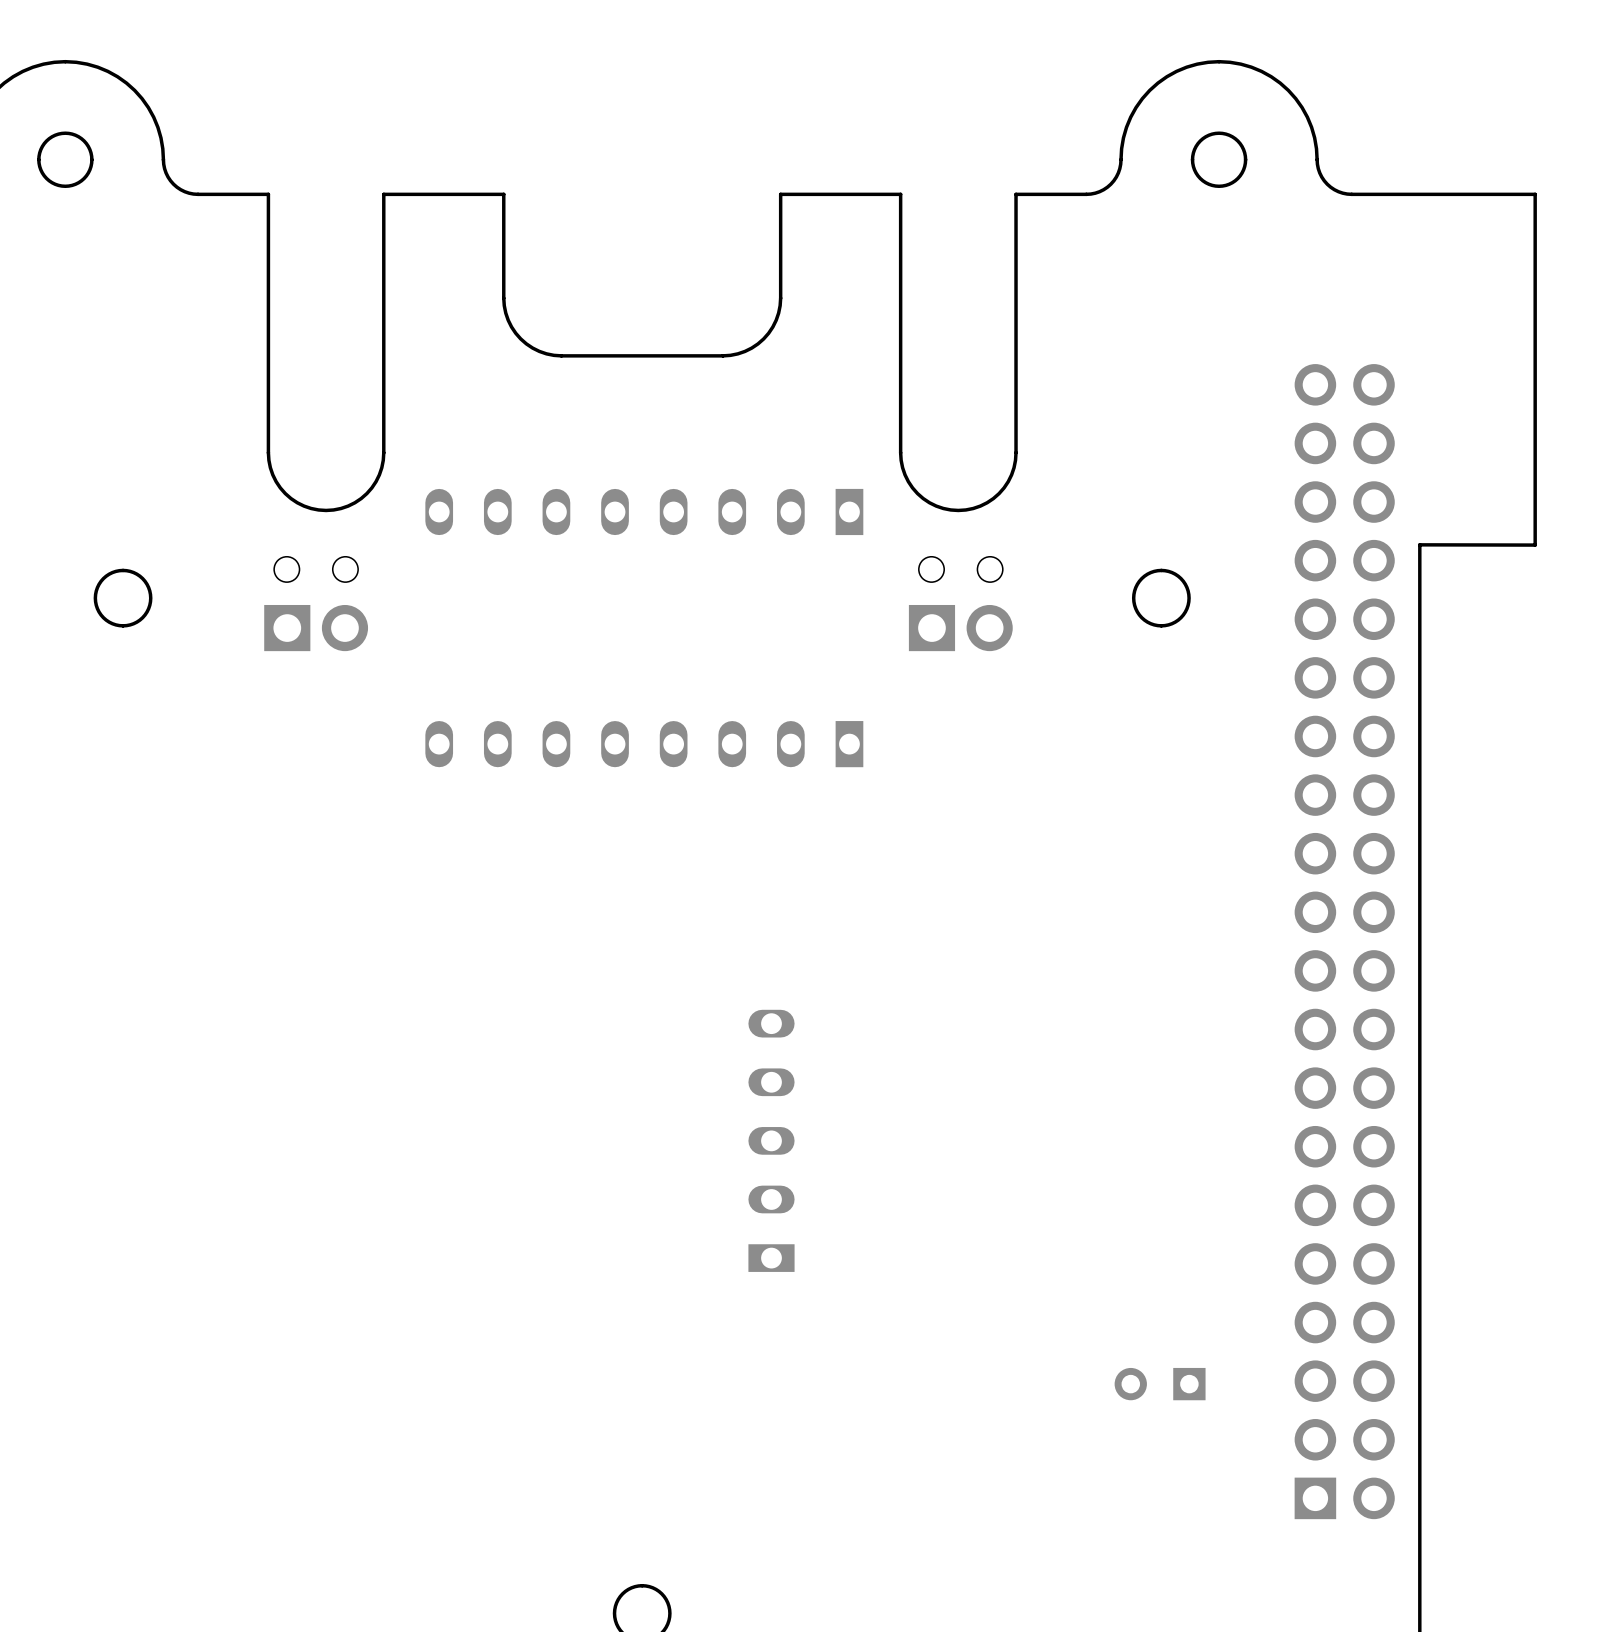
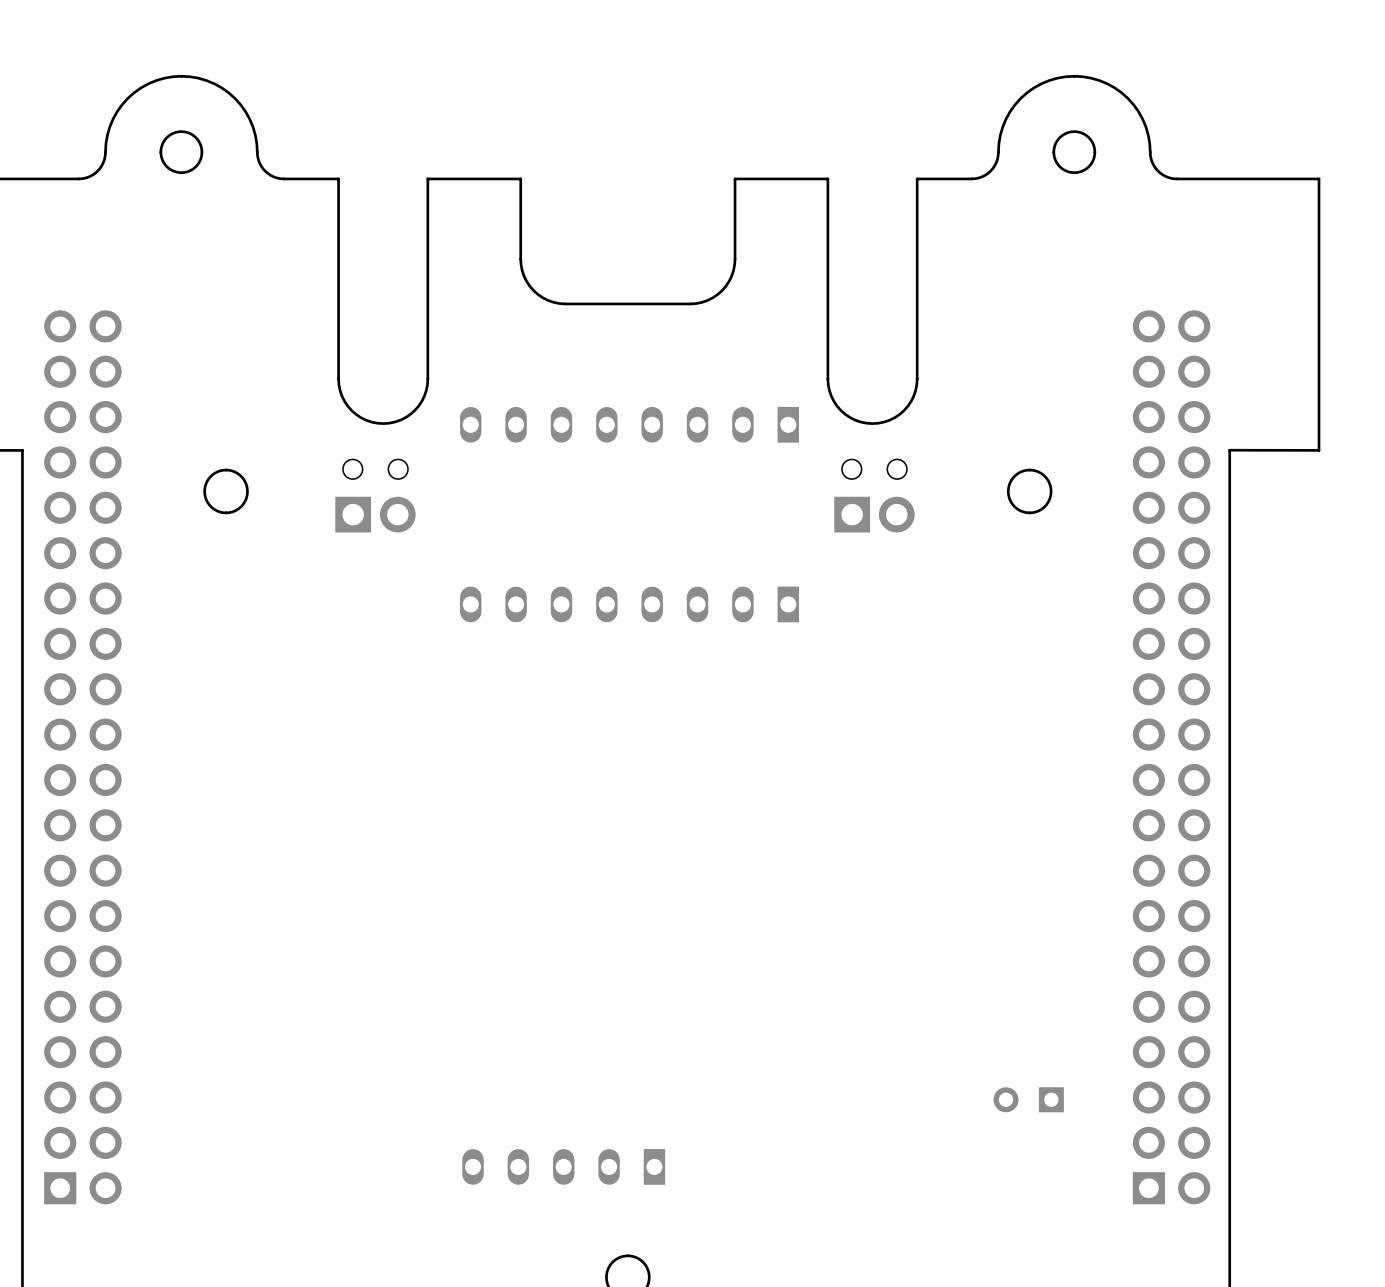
part rotation: 0° (771, 1140) -> 90° counterclockwise (563, 1166)
part position: (771, 1140) -> (563, 1166)

